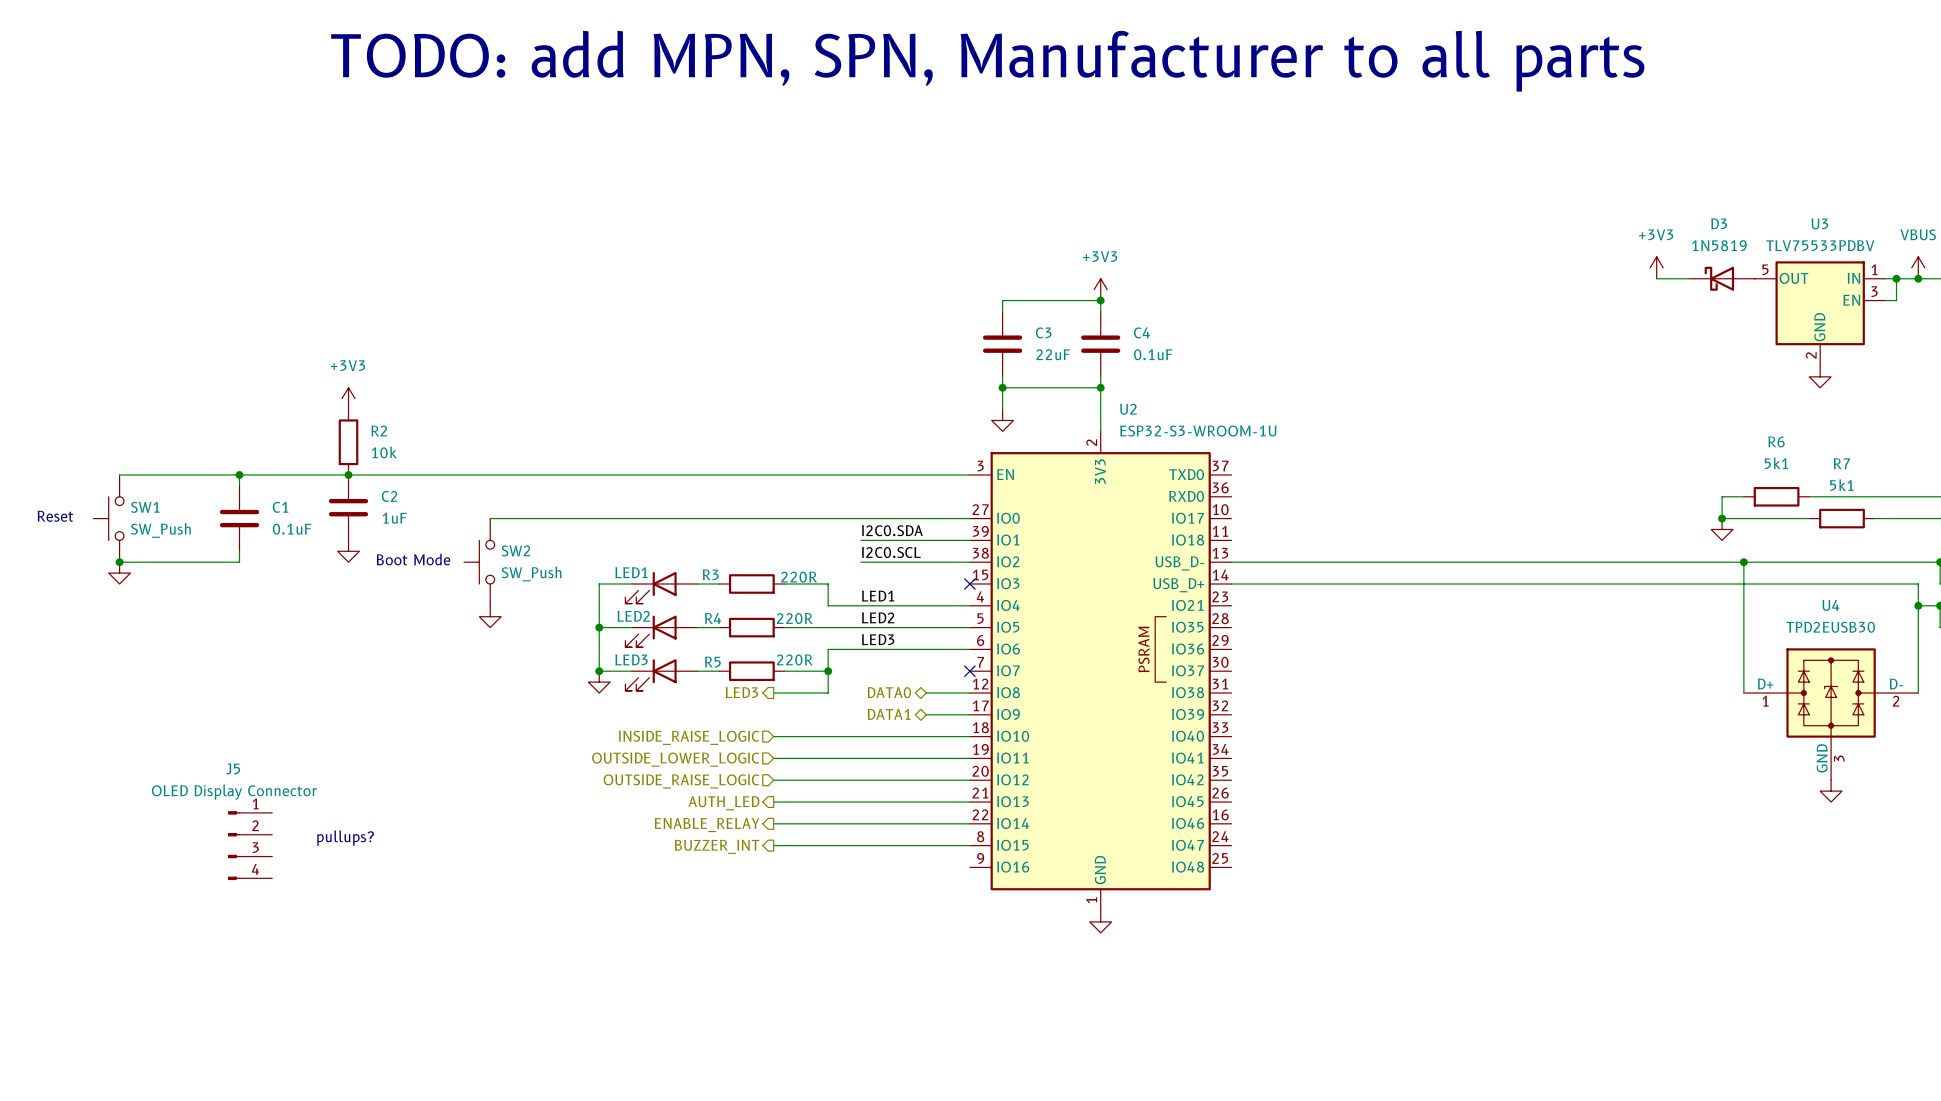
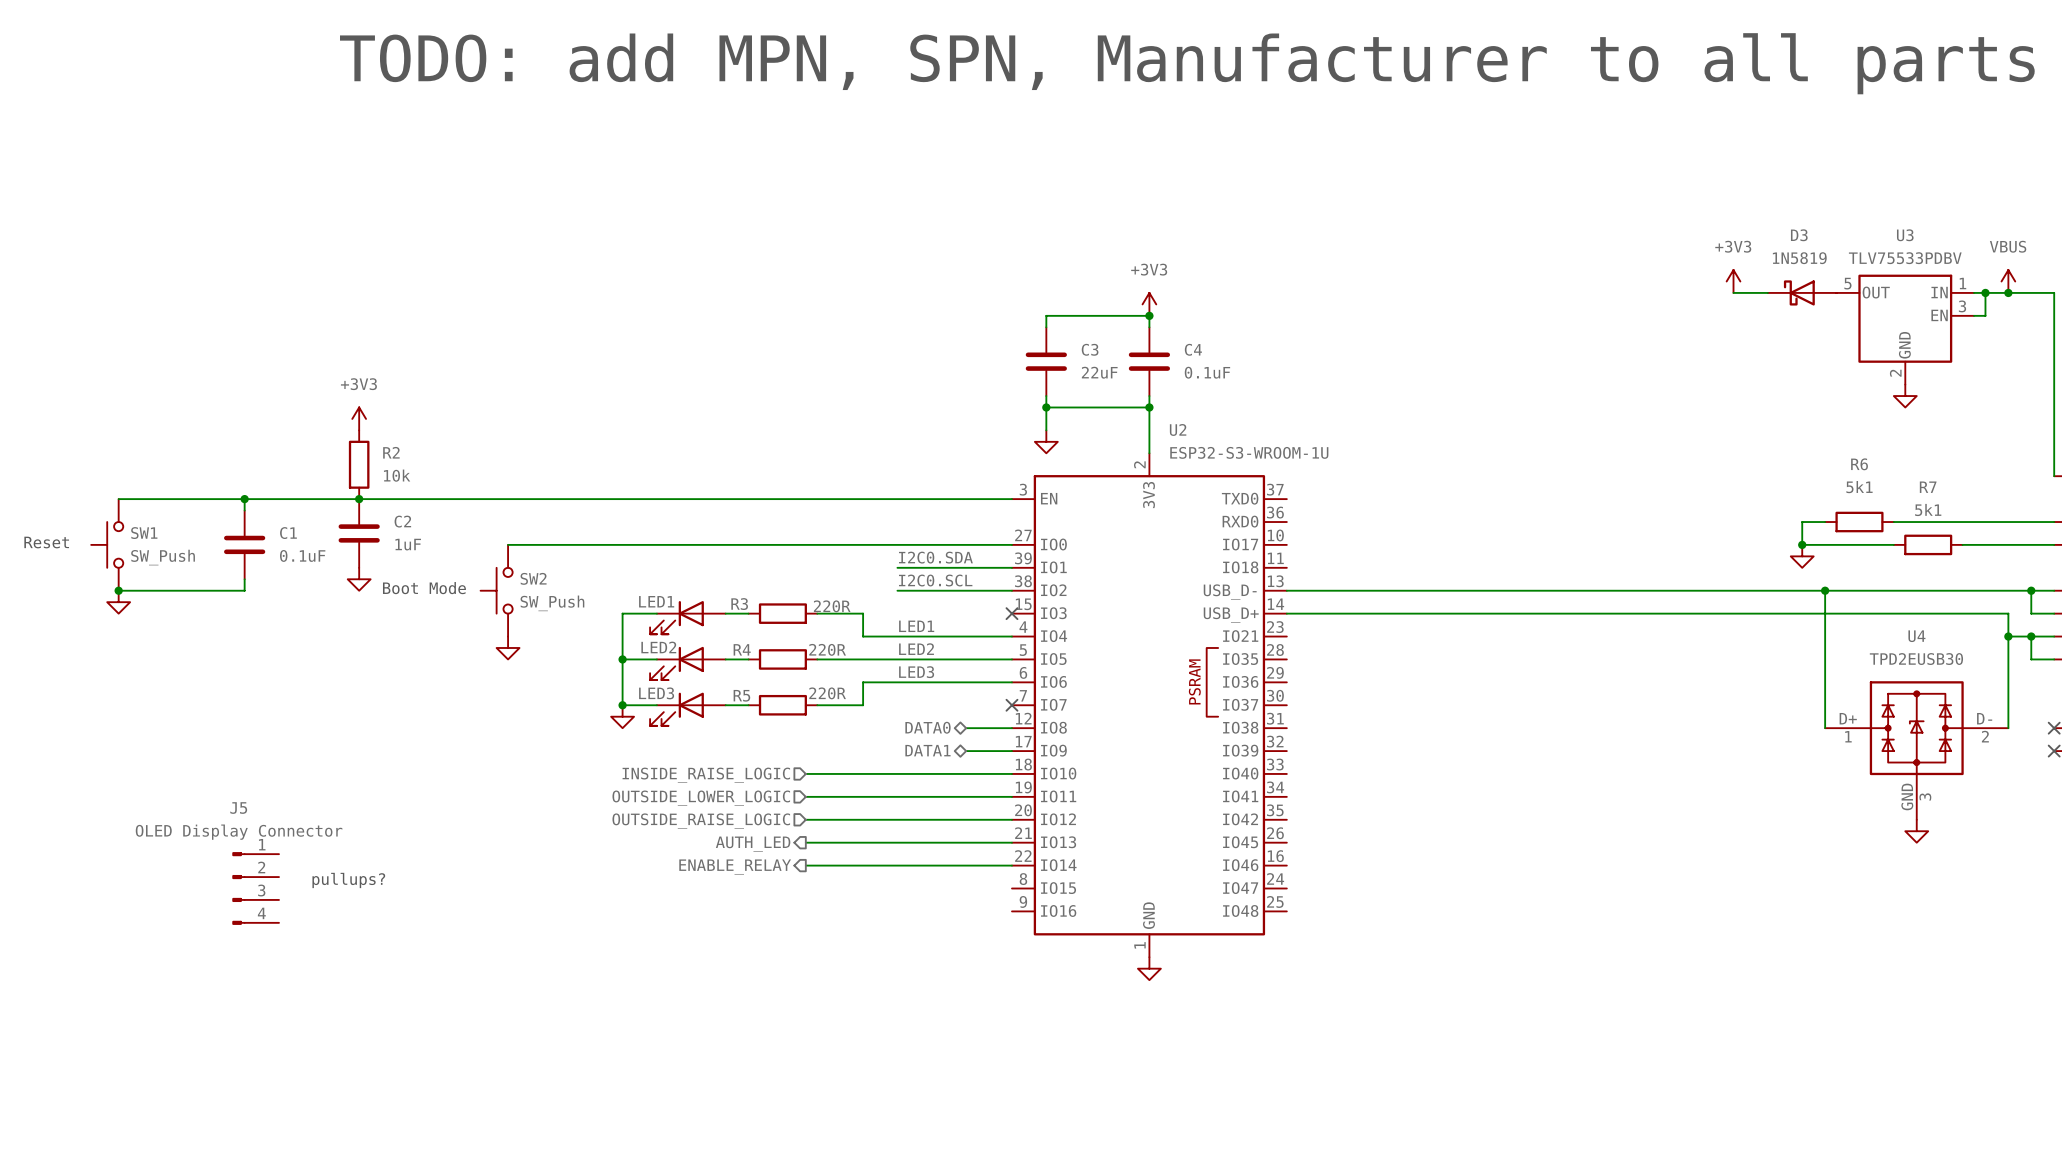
wire: (828, 671) (828, 693) (773, 693) -> none
junction: (828, 671) -> none
hierarchical label: LED3 (741, 692) -> none
wire: (773, 845) (969, 845) -> none
hierarchical label: BUZZER_INT (717, 846) -> none

